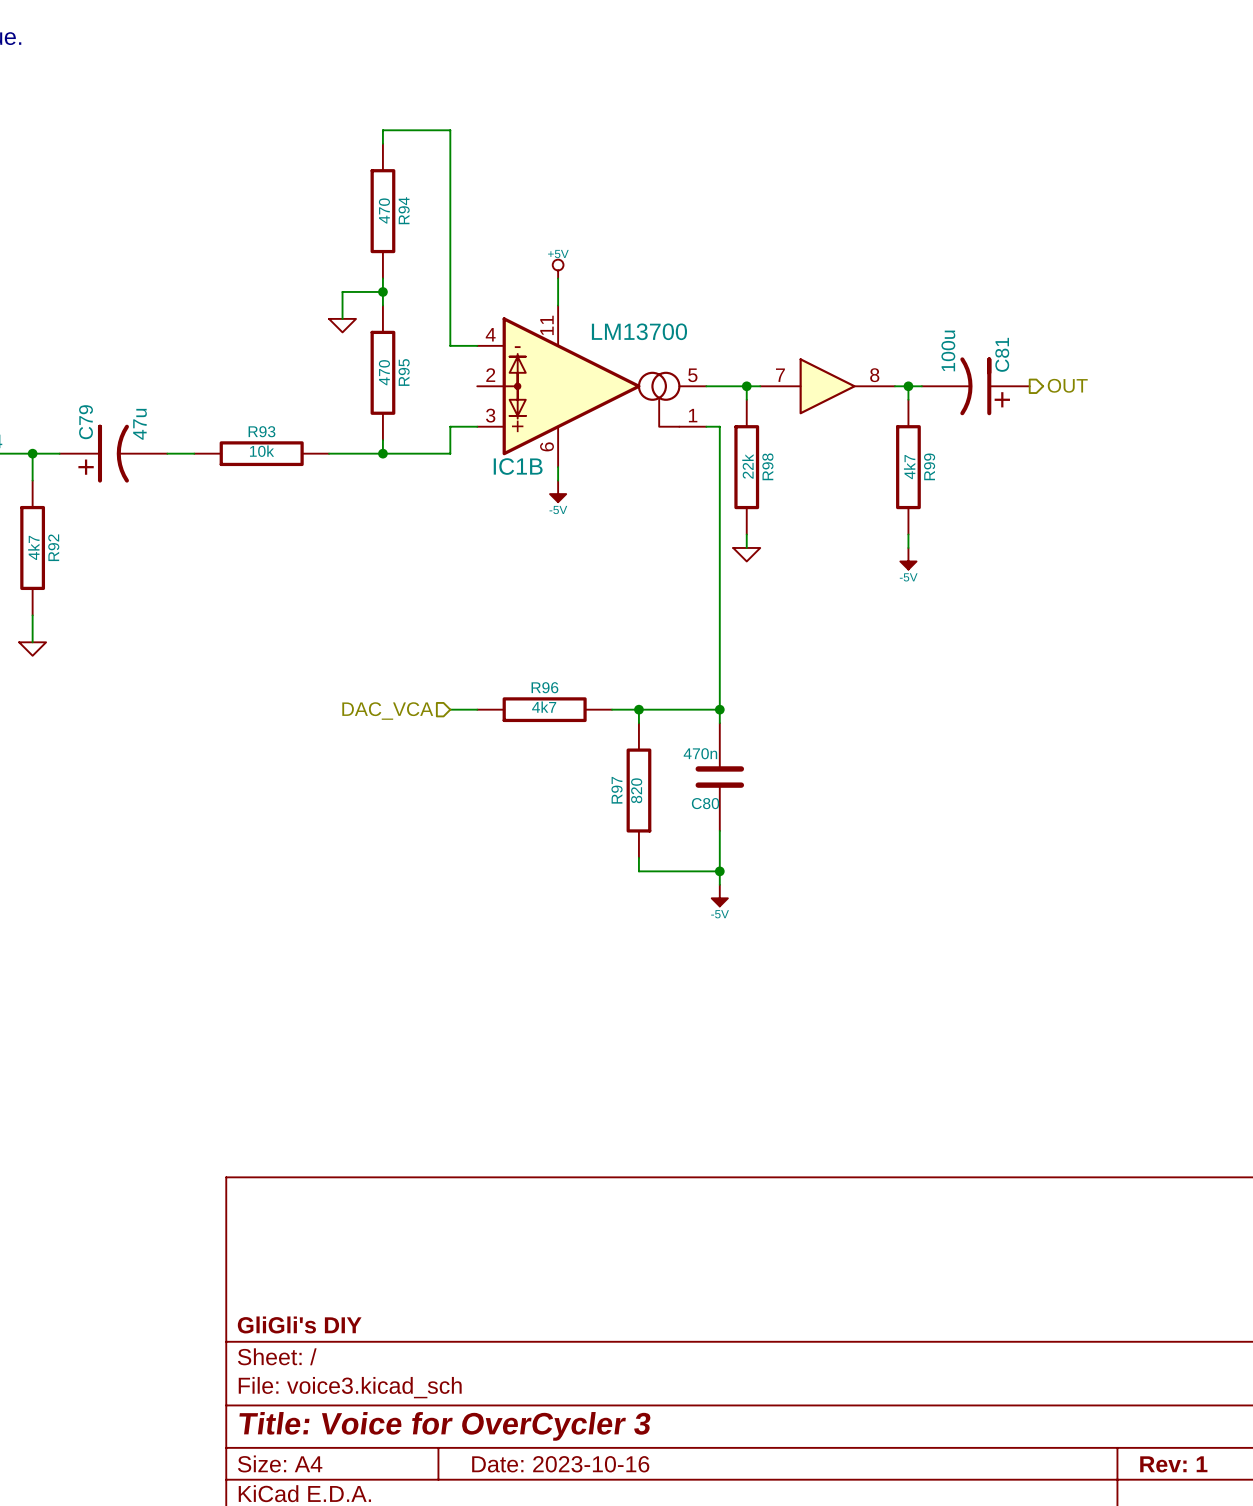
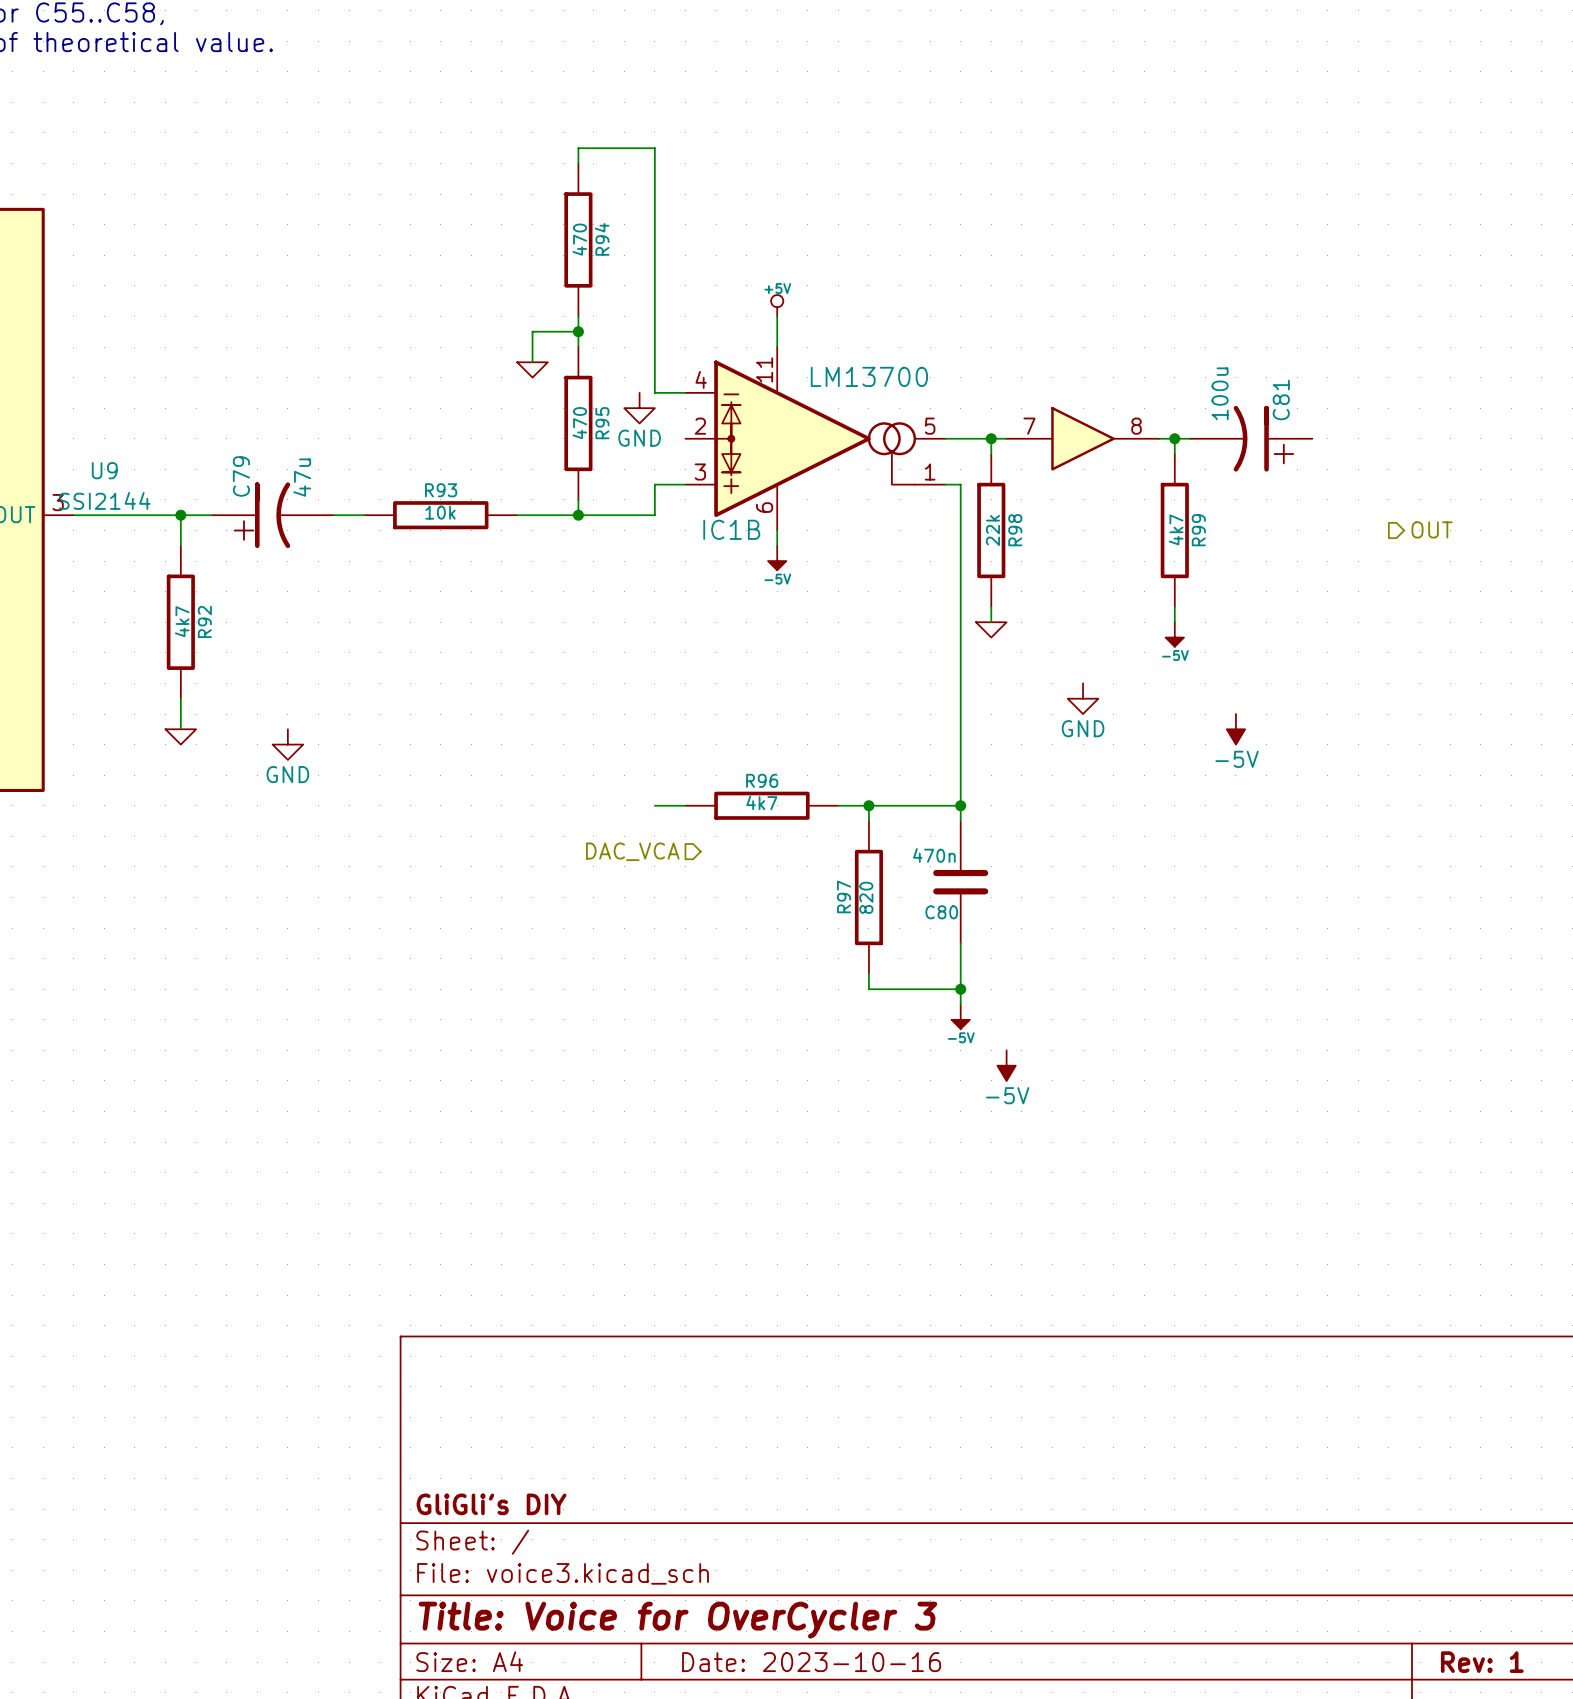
power symbol: none -> GND (639, 408)
hierarchical label position: OUT (1067, 385) -> OUT (1432, 529)
power symbol: none -> GND (1083, 698)
power symbol: none -> -5V (1235, 729)
power symbol: none -> GND (287, 744)
hierarchical label position: DAC_VCA (387, 711) -> DAC_VCA (632, 851)
power symbol: none -> -5V (1006, 1065)

